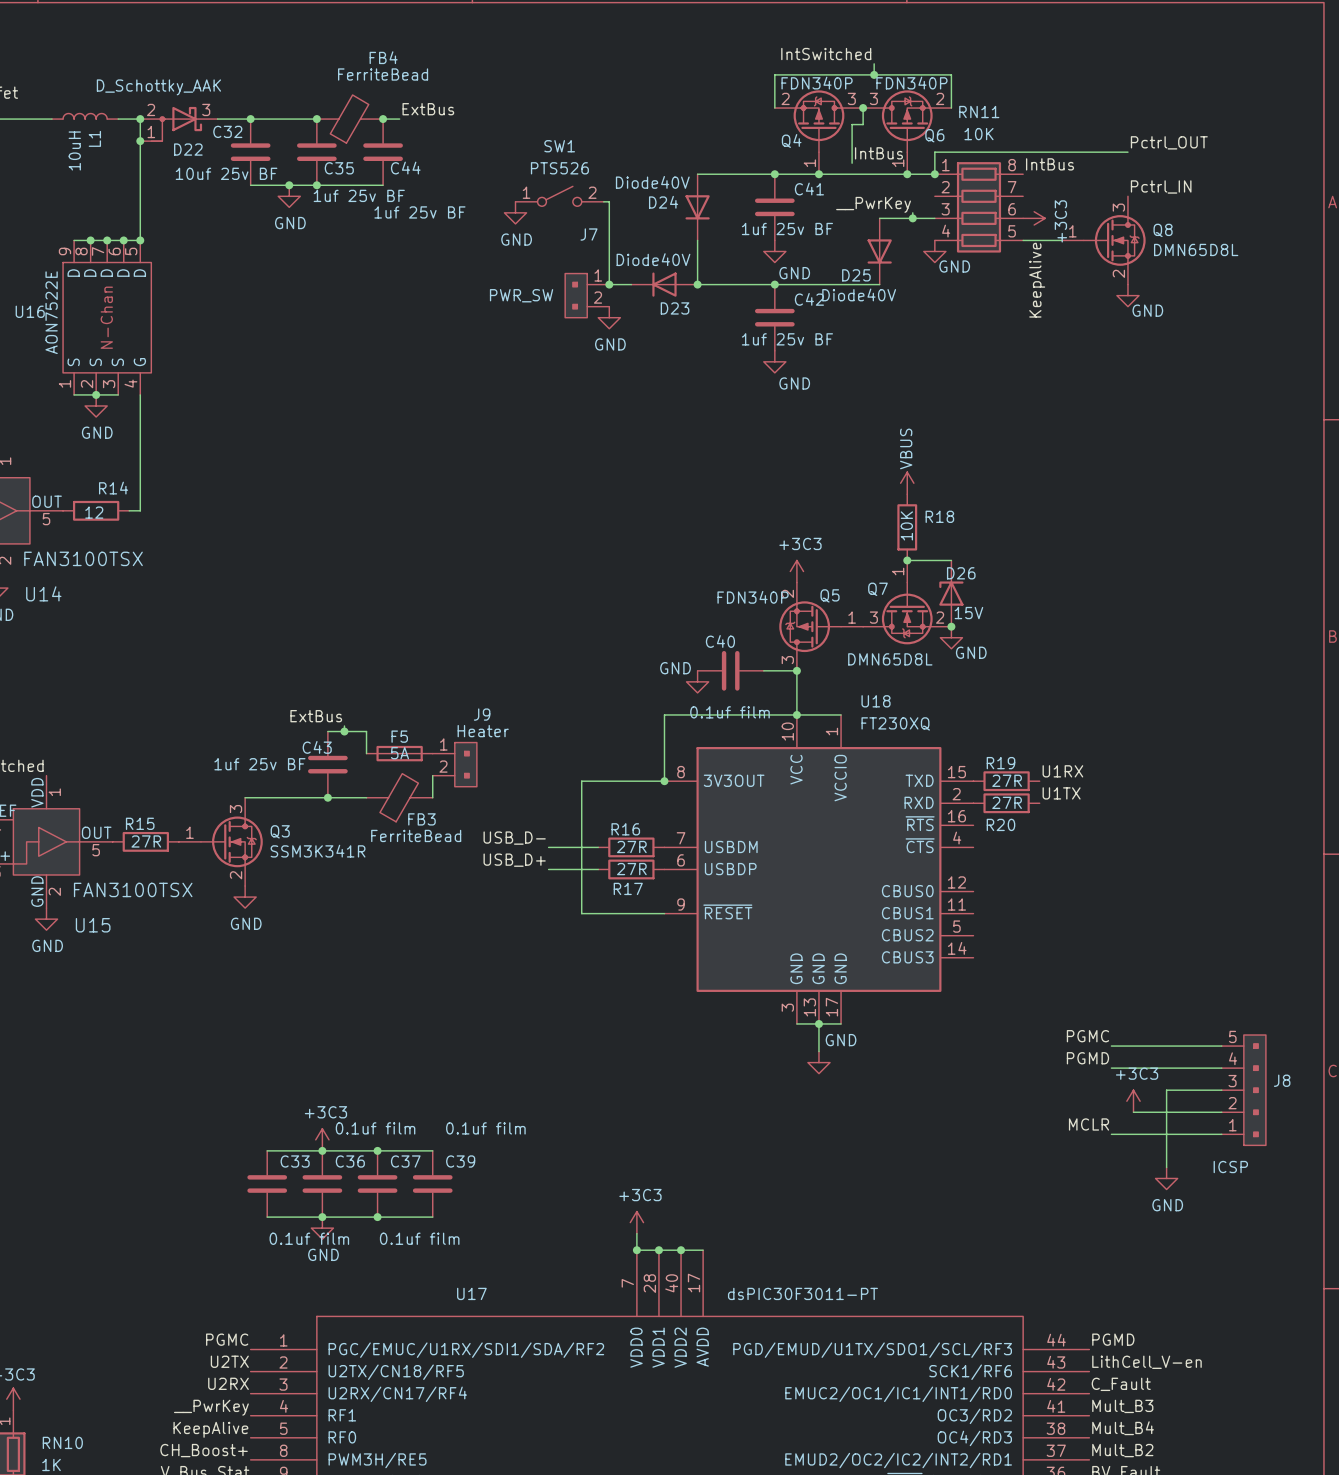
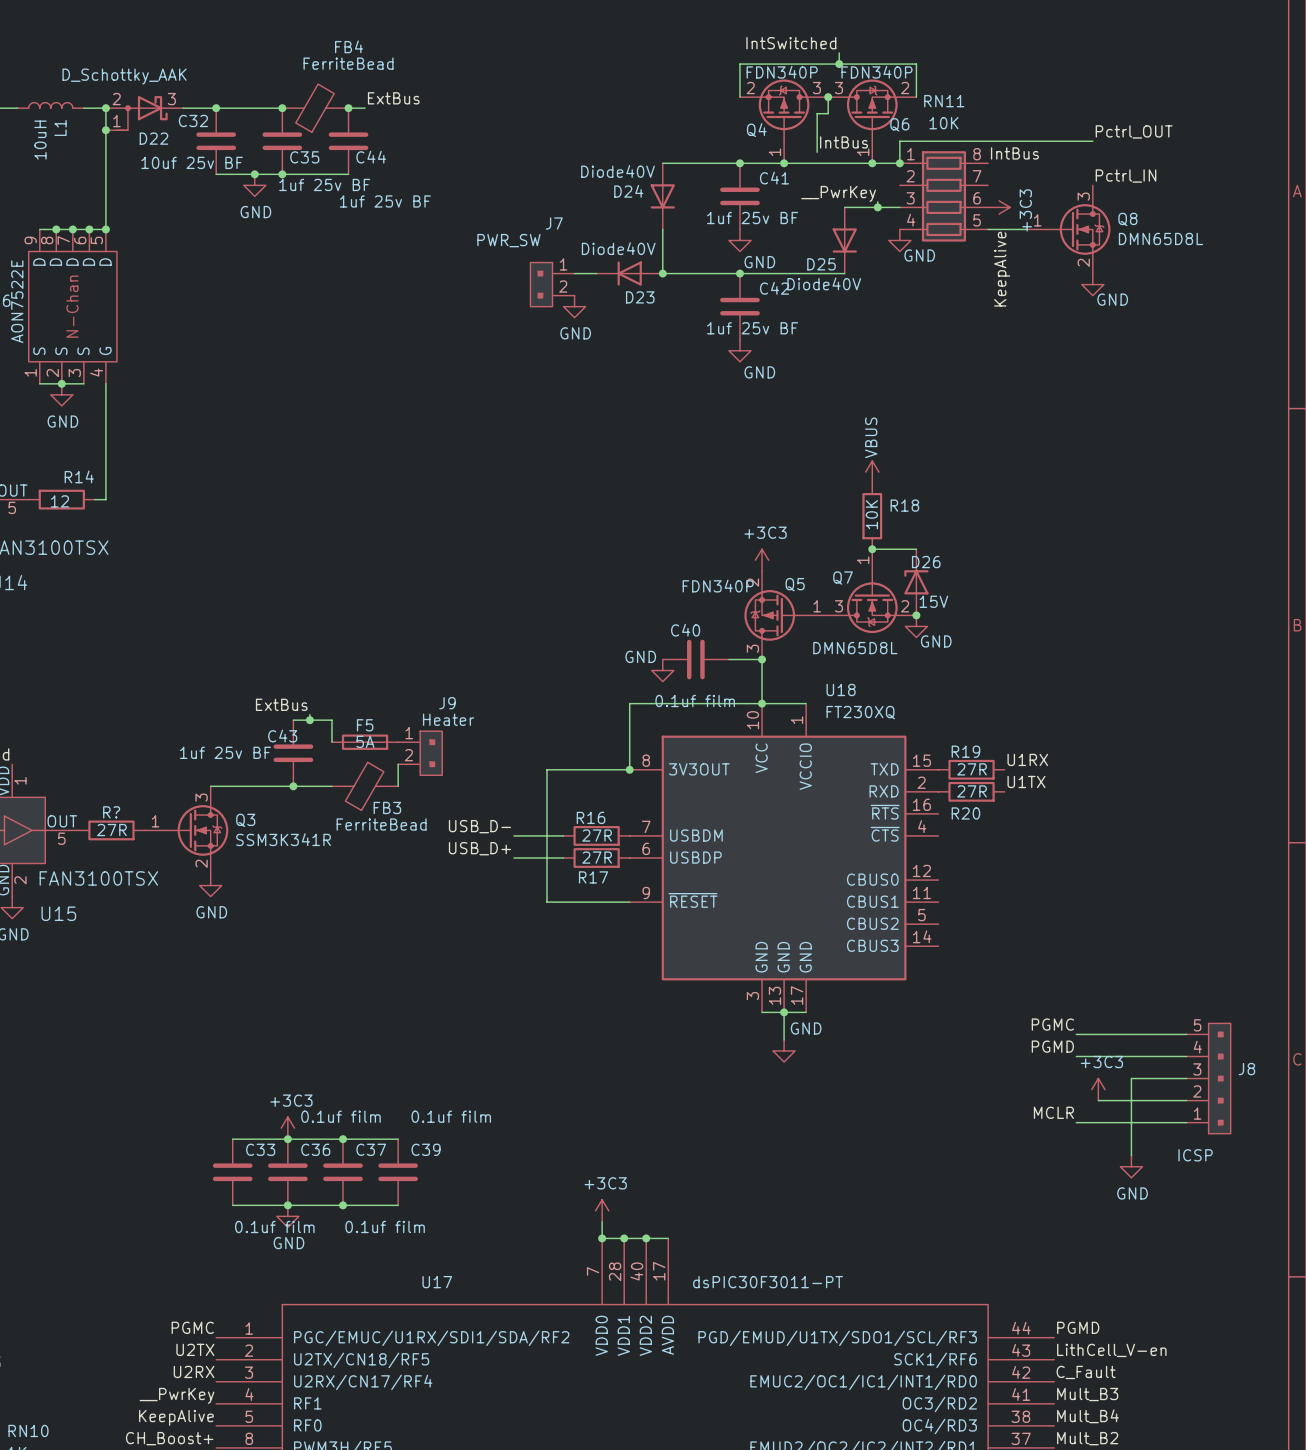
SW1: PTS526 (559, 196) -> none
wire: (603, 201) (609, 201) (609, 284) -> none
power symbol: GND (515, 212) -> none
junction: (609, 284) -> none
J7 value position: PWR_SW (521, 295) -> PWR_SW (508, 240)
R15 name: R15 (140, 823) -> R? (111, 812)

